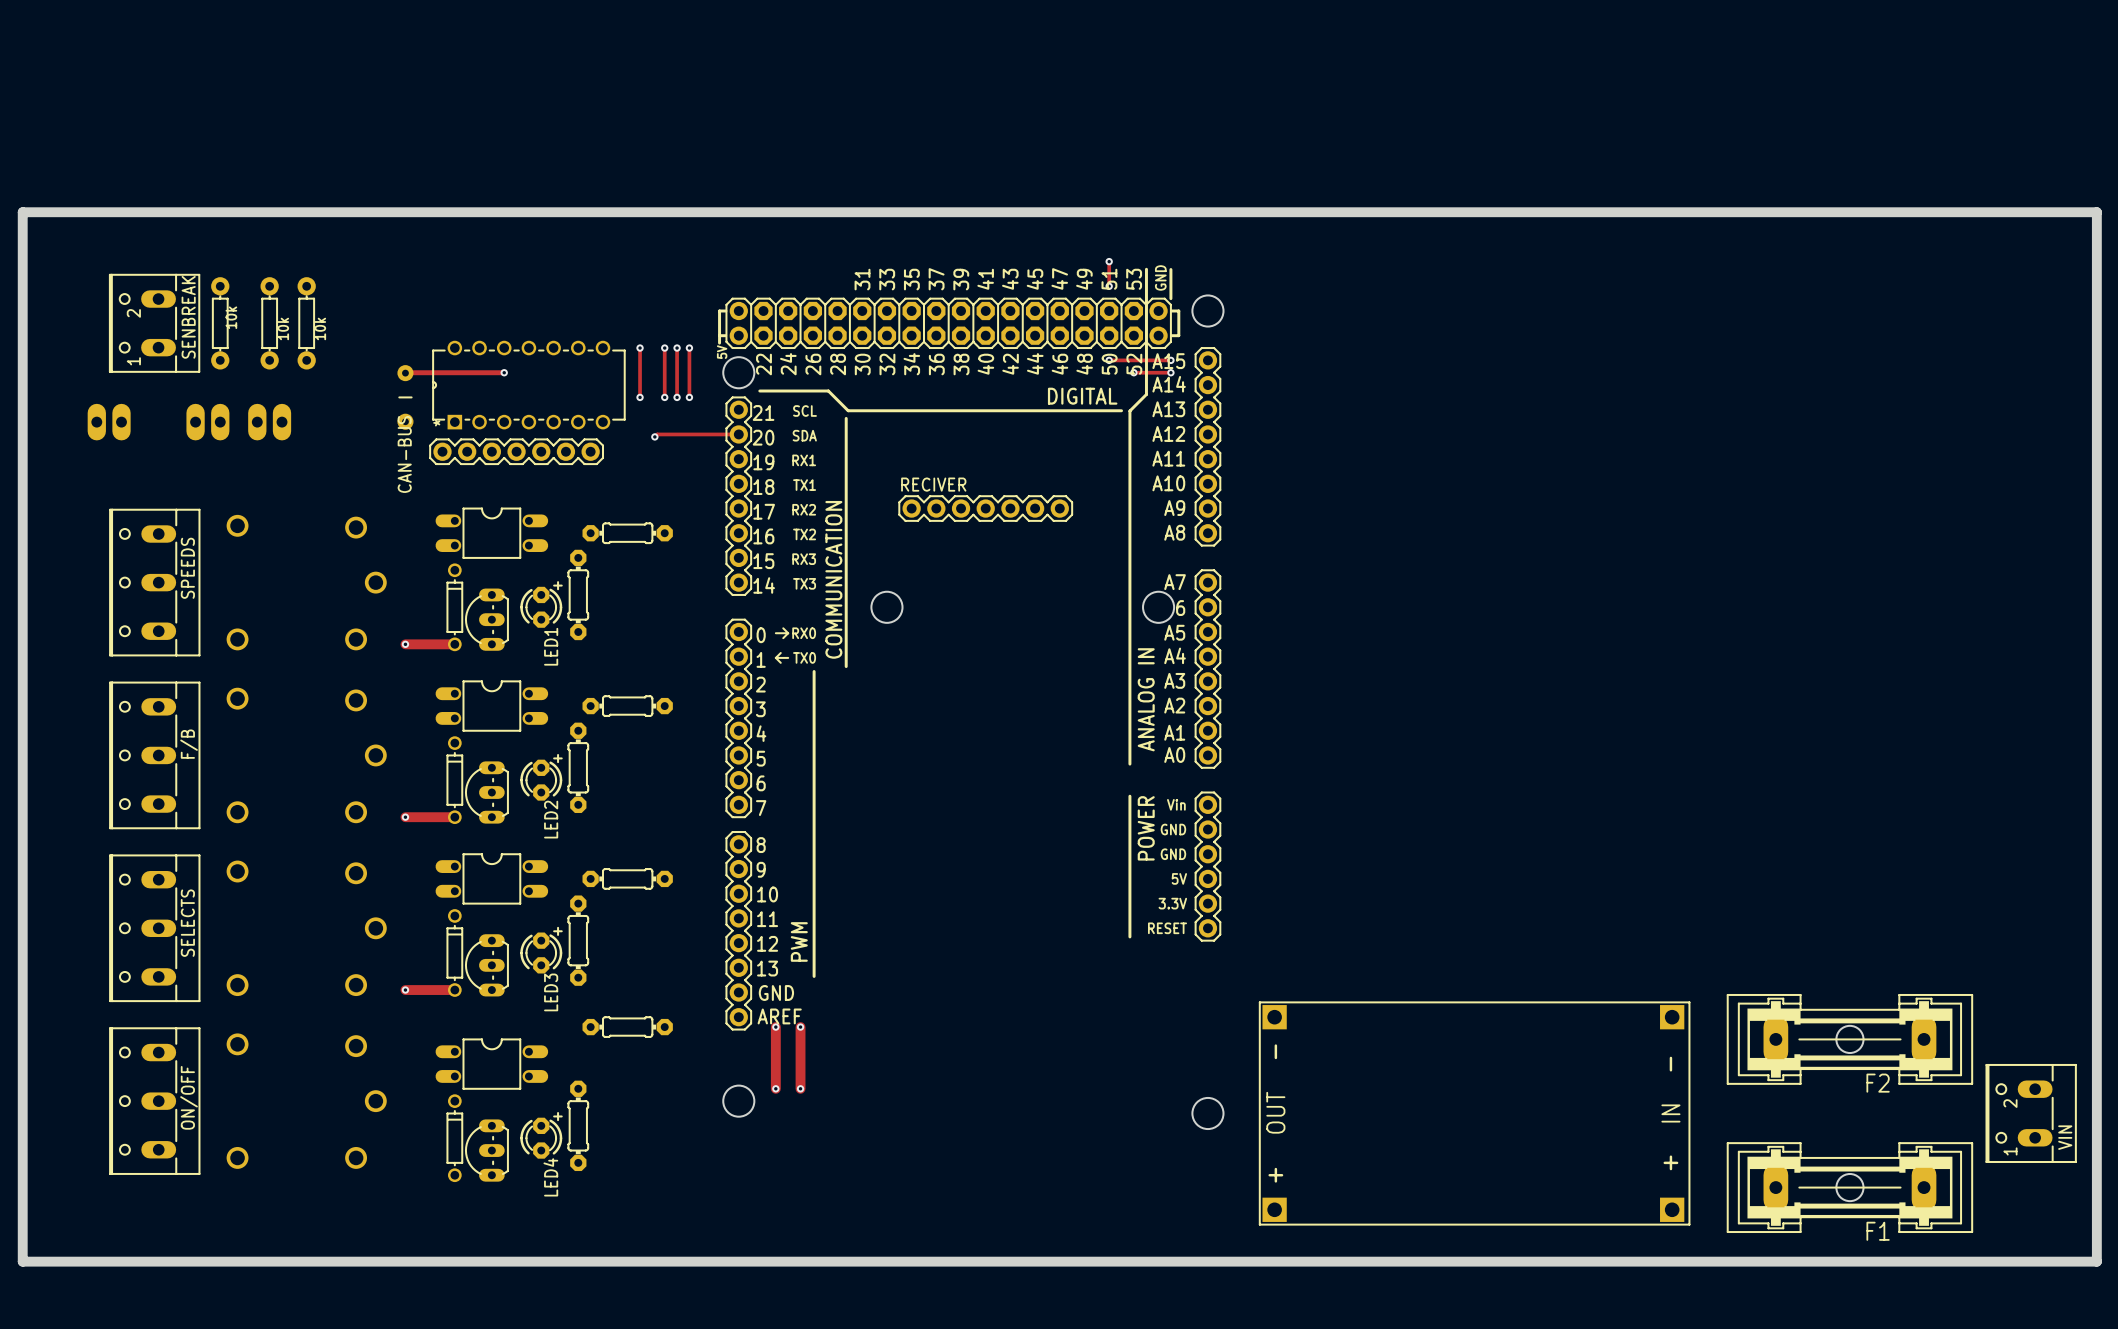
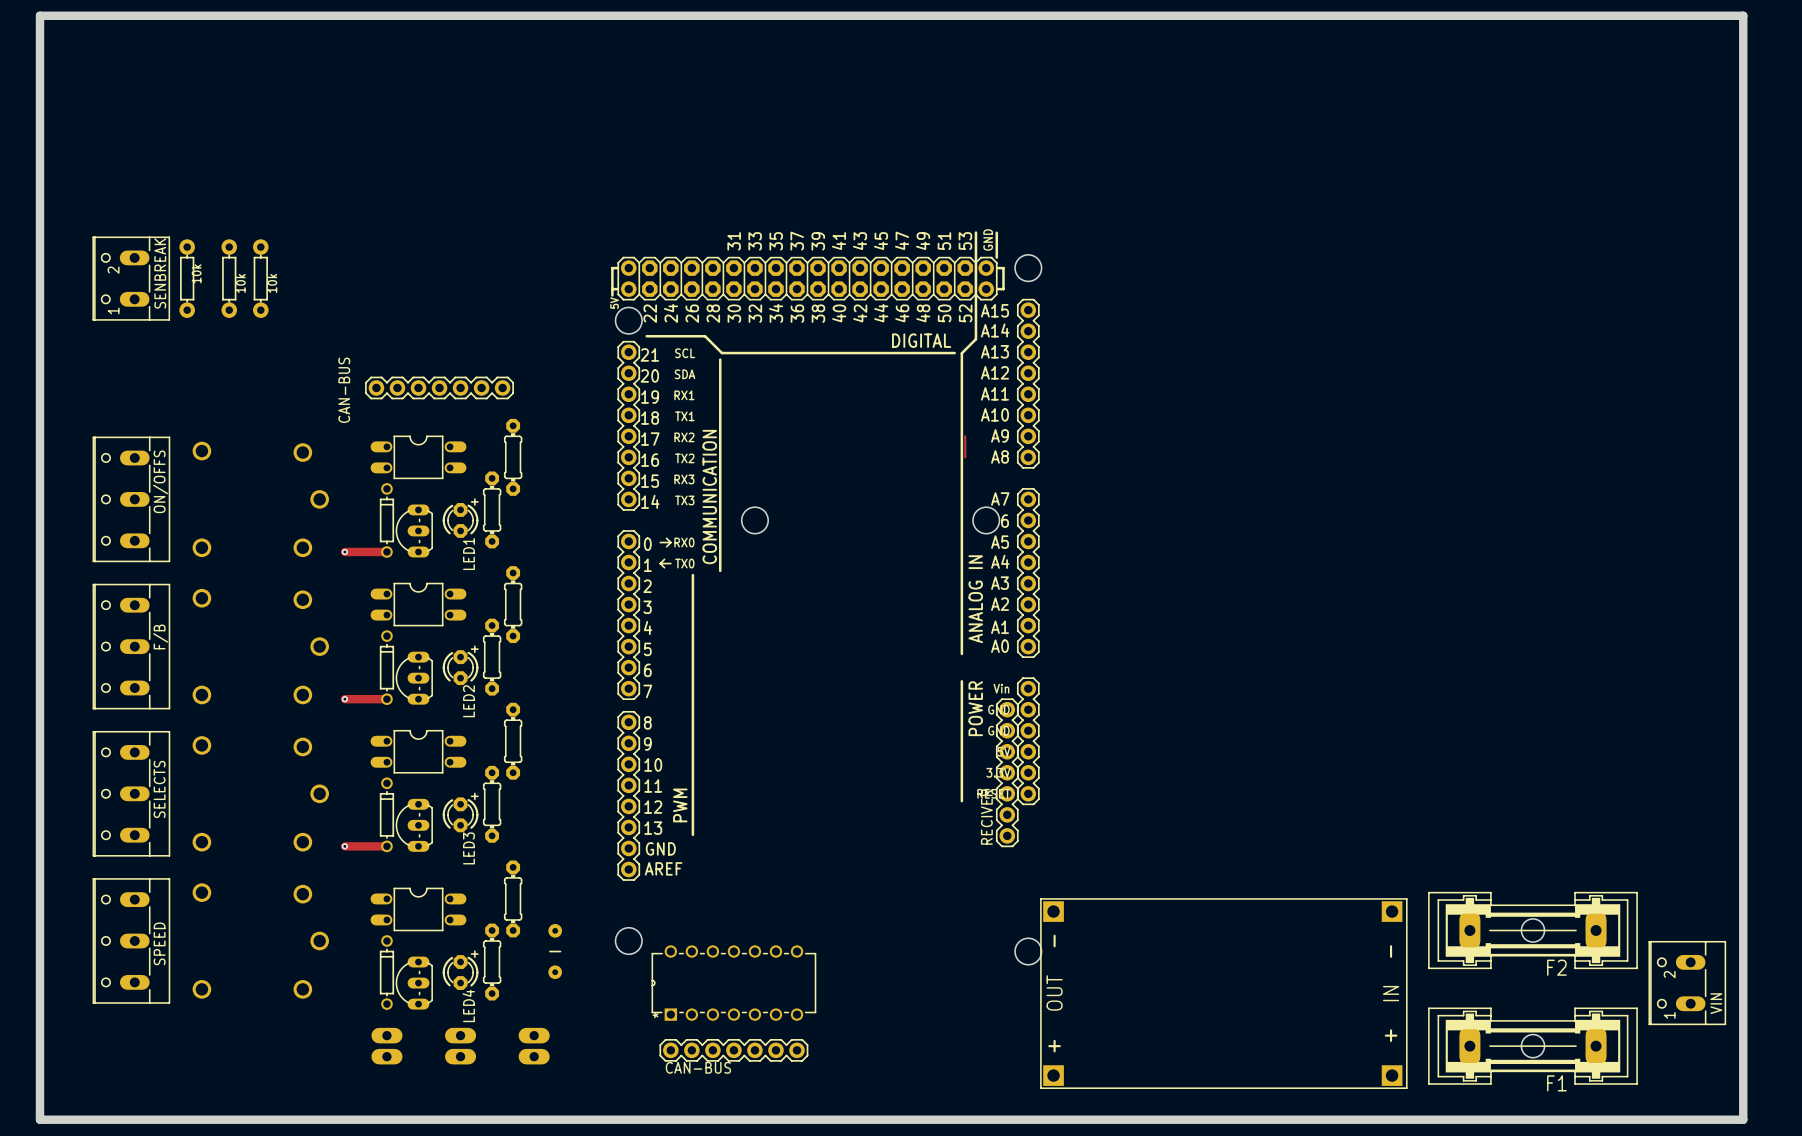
board edge: (22, 212) (22, 1261) (2096, 1261) (2096, 212) (22, 212) -> (40, 15) (40, 1119) (1743, 1119) (1743, 15) (40, 15)
track: (1109, 261) (1109, 286) -> none
via: (1109, 261) -> none
via: (1109, 286) -> none
track: (640, 348) (640, 397) -> none
via: (640, 348) -> none
track: (664, 348) (664, 397) -> none
via: (664, 348) -> none
track: (677, 348) (677, 397) -> none
via: (677, 348) -> none
track: (689, 348) (689, 397) -> none
via: (689, 348) -> none
track: (1109, 360) (1170, 360) -> none
via: (1109, 360) -> none
via: (1170, 360) -> none
track: (405, 372) (504, 372) -> none
via: (504, 372) -> none
track: (1133, 372) (1170, 372) -> none
via: (1133, 372) -> none
via: (1170, 372) -> none
part: (528, 385) -> none
part: (405, 397) -> none
via: (640, 397) -> none
via: (664, 397) -> none
via: (677, 397) -> none
via: (689, 397) -> none
part: (109, 422) -> none
part: (207, 422) -> none
part: (269, 422) -> none
track: (738, 434) (657, 434) (654, 436) -> none
via: (654, 436) -> none
RECIVER: (985, 508) -> none
track: none -> (965, 436) (965, 457)
part rotation: 0° (627, 533) -> 90° clockwise (513, 457)
SPEEDS name: SPEEDS (187, 568) -> ON/OFFS (160, 481)
part rotation: 0° (627, 706) -> 90° clockwise (513, 604)
part rotation: 0° (627, 878) -> 90° clockwise (513, 741)
RECIVER: none -> (1007, 772)
part rotation: 0° (627, 1027) -> 90° clockwise (513, 898)
track: (775, 1027) (775, 1088) -> none
via: (775, 1027) -> none
track: (800, 1027) (800, 1088) -> none
via: (800, 1027) -> none
F2 position: (1849, 1039) -> (1532, 930)
via: (775, 1088) -> none
via: (800, 1088) -> none
ON/OFF name: ON/OFF (189, 1097) -> SPEED (159, 943)
part: none -> (555, 951)
part position: (1474, 1113) -> (1223, 993)
VIN position: (2031, 1113) -> (1687, 983)
part: none -> (733, 983)
F1 position: (1849, 1187) -> (1532, 1046)
part: none -> (386, 1046)
part: none -> (460, 1046)
part: none -> (534, 1046)
CAN-BUS: none -> (733, 1050)

